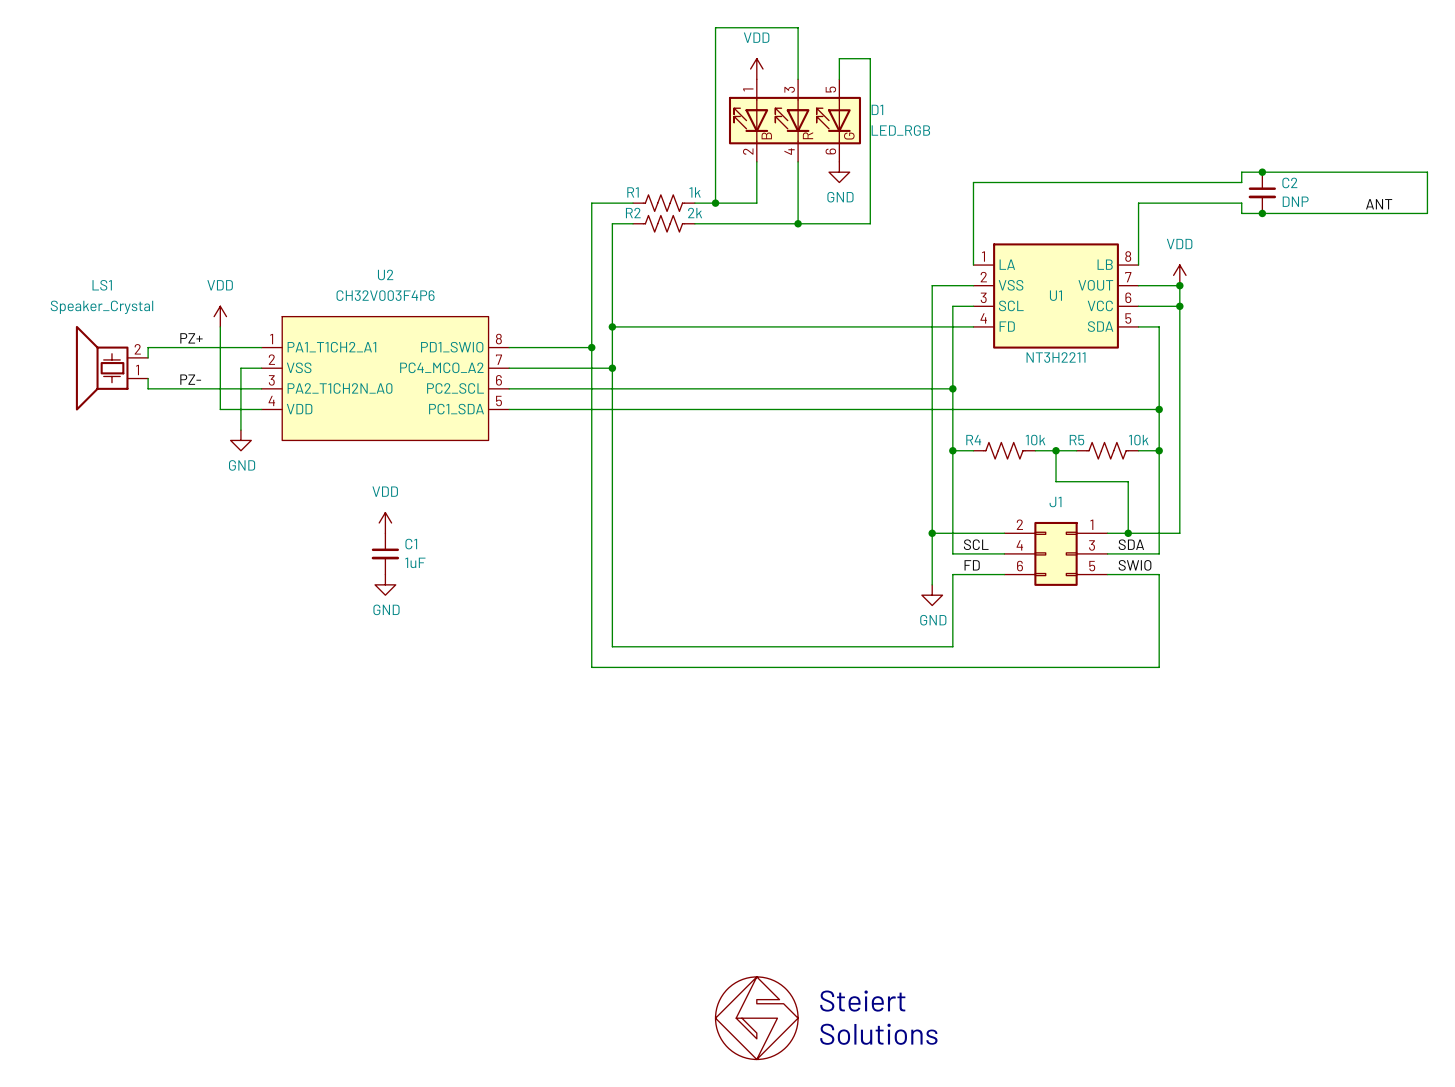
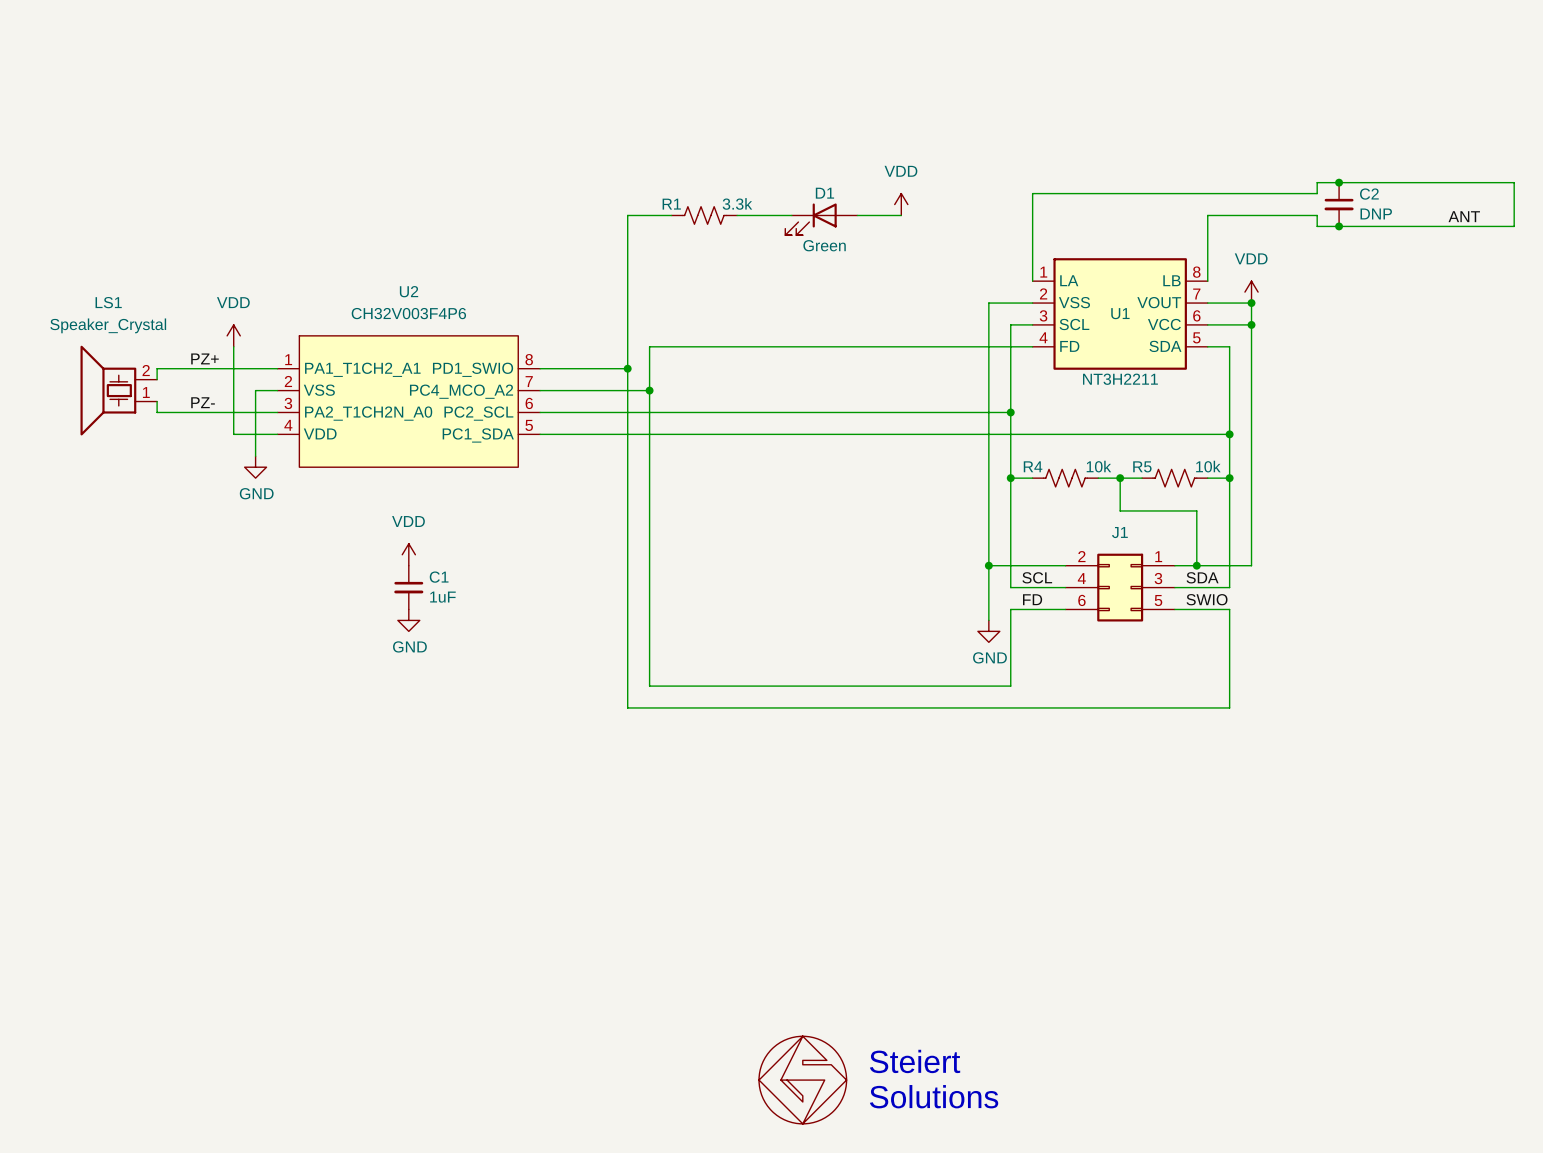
power symbol position: VDD (756, 69) -> VDD (901, 204)
D1 symbol: [728, 79, 862, 162] -> [785, 203, 858, 236]
wire: (798, 79) (798, 27) (715, 27) (715, 203) -> none
wire: (839, 79) (839, 58) (870, 58) (870, 223) (694, 223) -> none
D1 name position: D1 (877, 109) -> D1 (824, 193)
D1 value: LED_RGB (900, 130) -> Green (824, 245)
wire: (756, 161) (756, 203) (746, 203) -> none
wire: (798, 161) (798, 223) -> none
power symbol: GND (839, 172) -> none
R1 value: 1k (695, 192) -> 3.3k (737, 203)
junction: (715, 203) -> none
wire: none -> (857, 215) (901, 215)
wire: (633, 223) (612, 223) (612, 326) -> none
R2: 2k (663, 223) -> none
junction: (798, 223) -> none
junction: (612, 326) -> none

